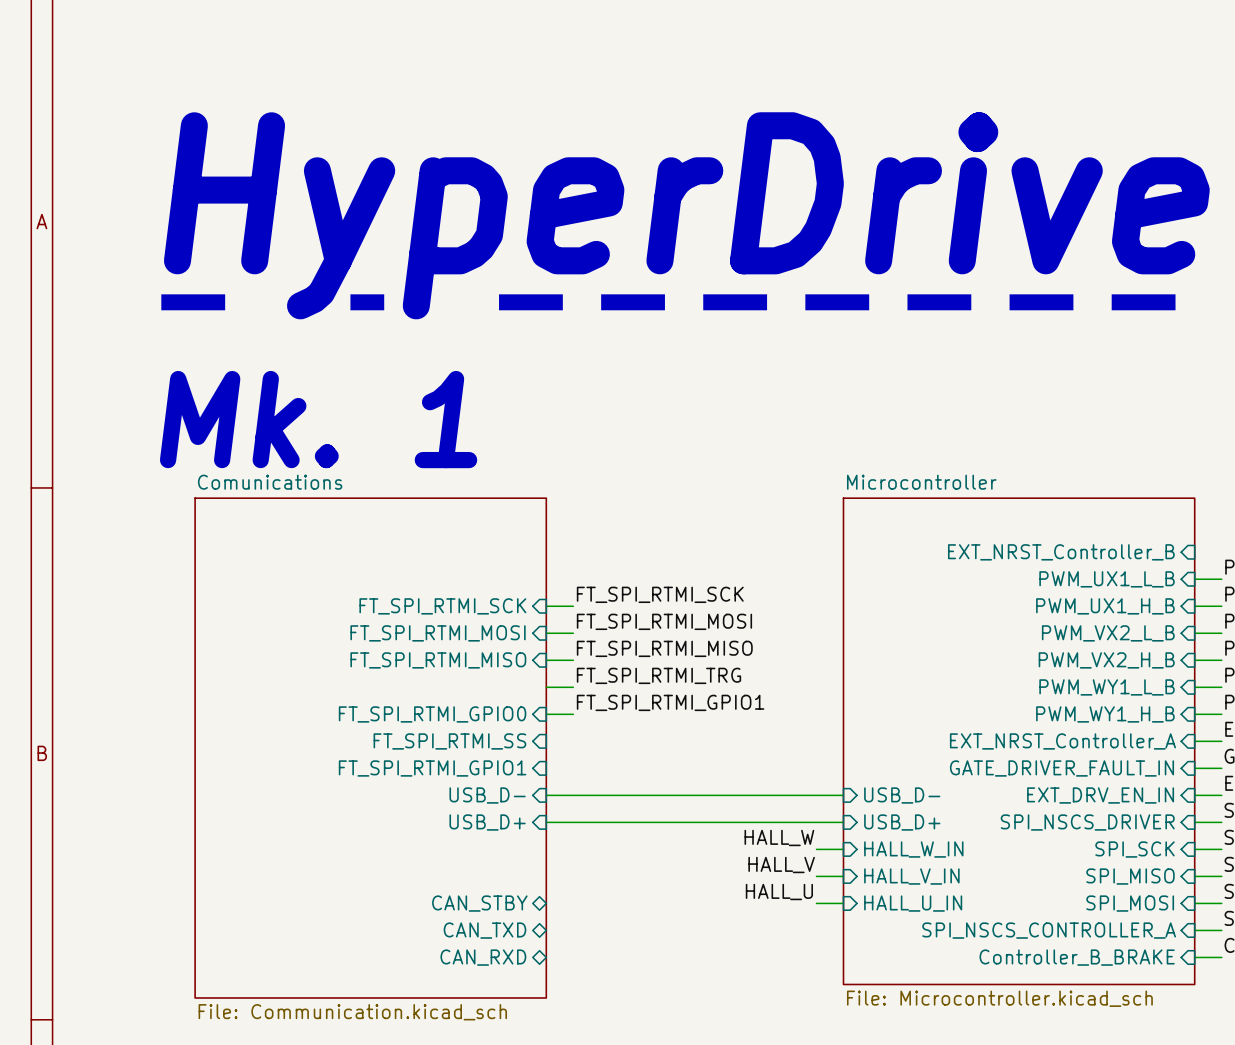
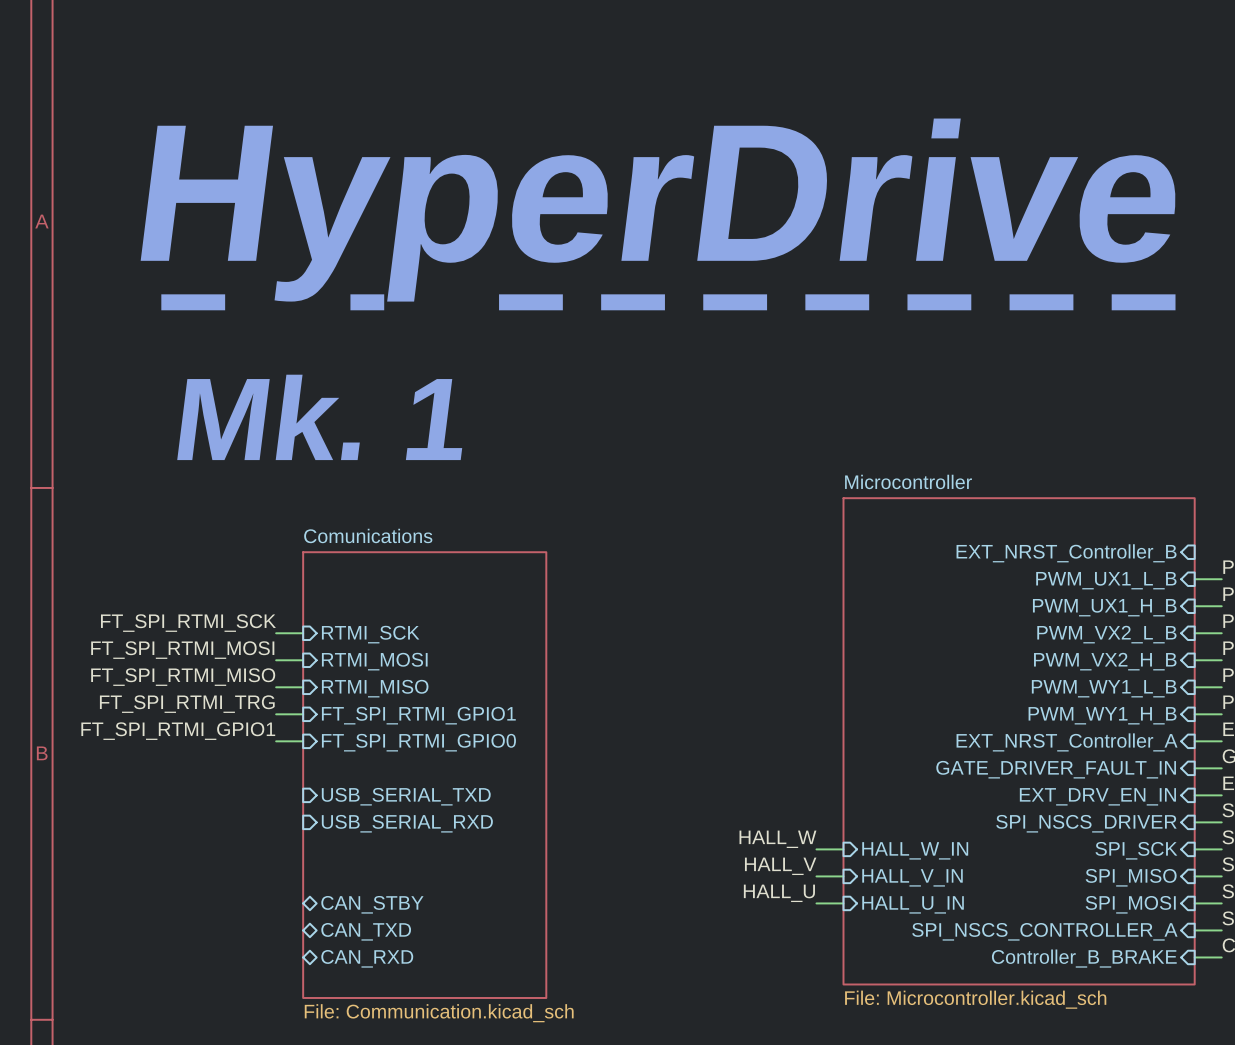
label: FT_SPI_RTMI_SCK (660, 594) -> none
sheet pin: FT_SPI_RTMI_SCK (442, 606) -> RTMI_SCK (370, 634)
wire: (546, 606) (573, 606) -> none
label: none -> FT_SPI_RTMI_SCK (188, 623)
label: FT_SPI_RTMI_MOSI (664, 621) -> none
wire: none -> (276, 633) (303, 633)
sheet pin: FT_SPI_RTMI_MOSI (438, 633) -> RTMI_MOSI (374, 661)
wire: (546, 633) (573, 633) -> none
label: none -> FT_SPI_RTMI_MOSI (182, 650)
label: FT_SPI_RTMI_MISO (664, 648) -> none
wire: none -> (276, 660) (303, 660)
sheet pin: FT_SPI_RTMI_MISO (438, 660) -> RTMI_MISO (375, 688)
wire: (546, 660) (573, 660) -> none
label: none -> FT_SPI_RTMI_MISO (183, 677)
label: FT_SPI_RTMI_TRG (658, 675) -> none
wire: none -> (276, 687) (303, 687)
wire: (546, 687) (573, 687) -> none
label: none -> FT_SPI_RTMI_TRG (187, 704)
label: FT_SPI_RTMI_GPIO1 (670, 702) -> none
wire: none -> (276, 714) (303, 714)
sheet pin rotation: 0° (432, 714) -> 180° (418, 742)
wire: (546, 714) (573, 714) -> none
label: none -> FT_SPI_RTMI_GPIO1 (178, 731)
wire: none -> (276, 741) (303, 741)
sheet pin: FT_SPI_RTMI_SS (449, 741) -> none
sheet Comunications: File: Communication.kicad_sch (370, 748) -> none
sheet pin rotation: 0° (432, 768) -> 180° (418, 715)
sheet Comunications: none -> File: Communication.kicad_sch (424, 775)
sheet pin: none -> USB_SERIAL_TXD (406, 796)
sheet pin: USB_D- (487, 795) -> none
wire: (546, 795) (843, 795) -> none
sheet pin: USB_D- (902, 795) -> none
sheet pin: none -> USB_SERIAL_RXD (407, 823)
sheet pin: USB_D+ (487, 822) -> none
wire: (546, 822) (843, 822) -> none
sheet pin: USB_D+ (902, 822) -> none
sheet pin rotation: 0° (479, 903) -> 180° (372, 904)
sheet pin rotation: 0° (484, 930) -> 180° (366, 931)
sheet pin position: CAN_TXD (484, 930) -> CAN_TXD (366, 931)
sheet pin rotation: 0° (483, 957) -> 180° (367, 958)
sheet pin position: CAN_RXD (483, 957) -> CAN_RXD (367, 958)

